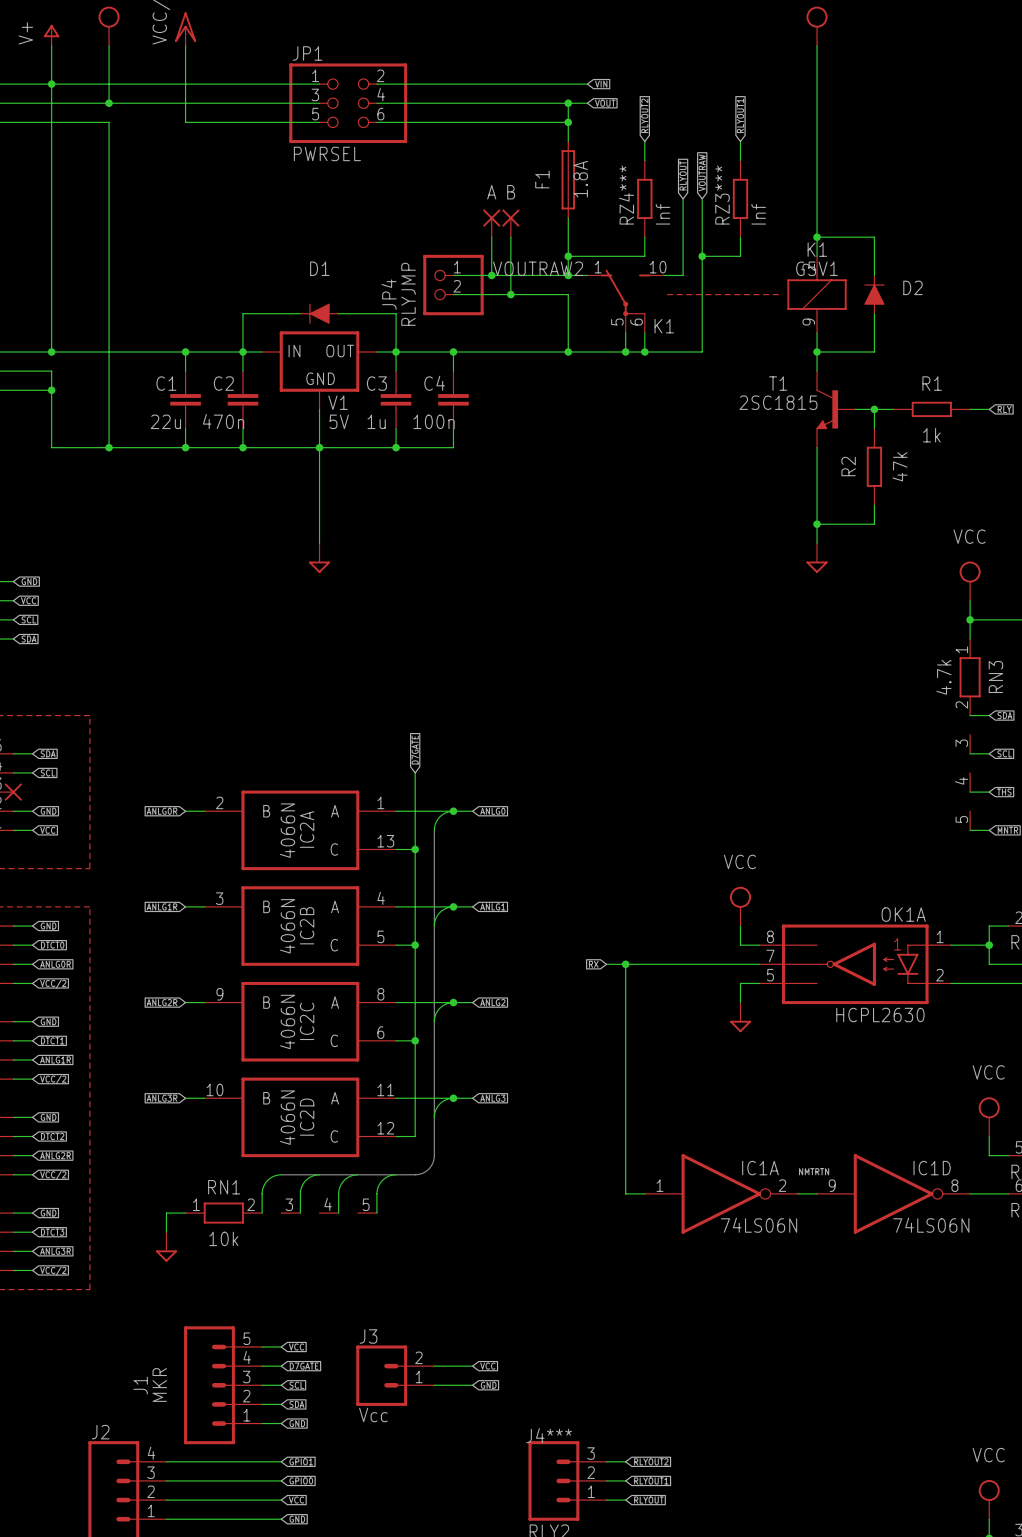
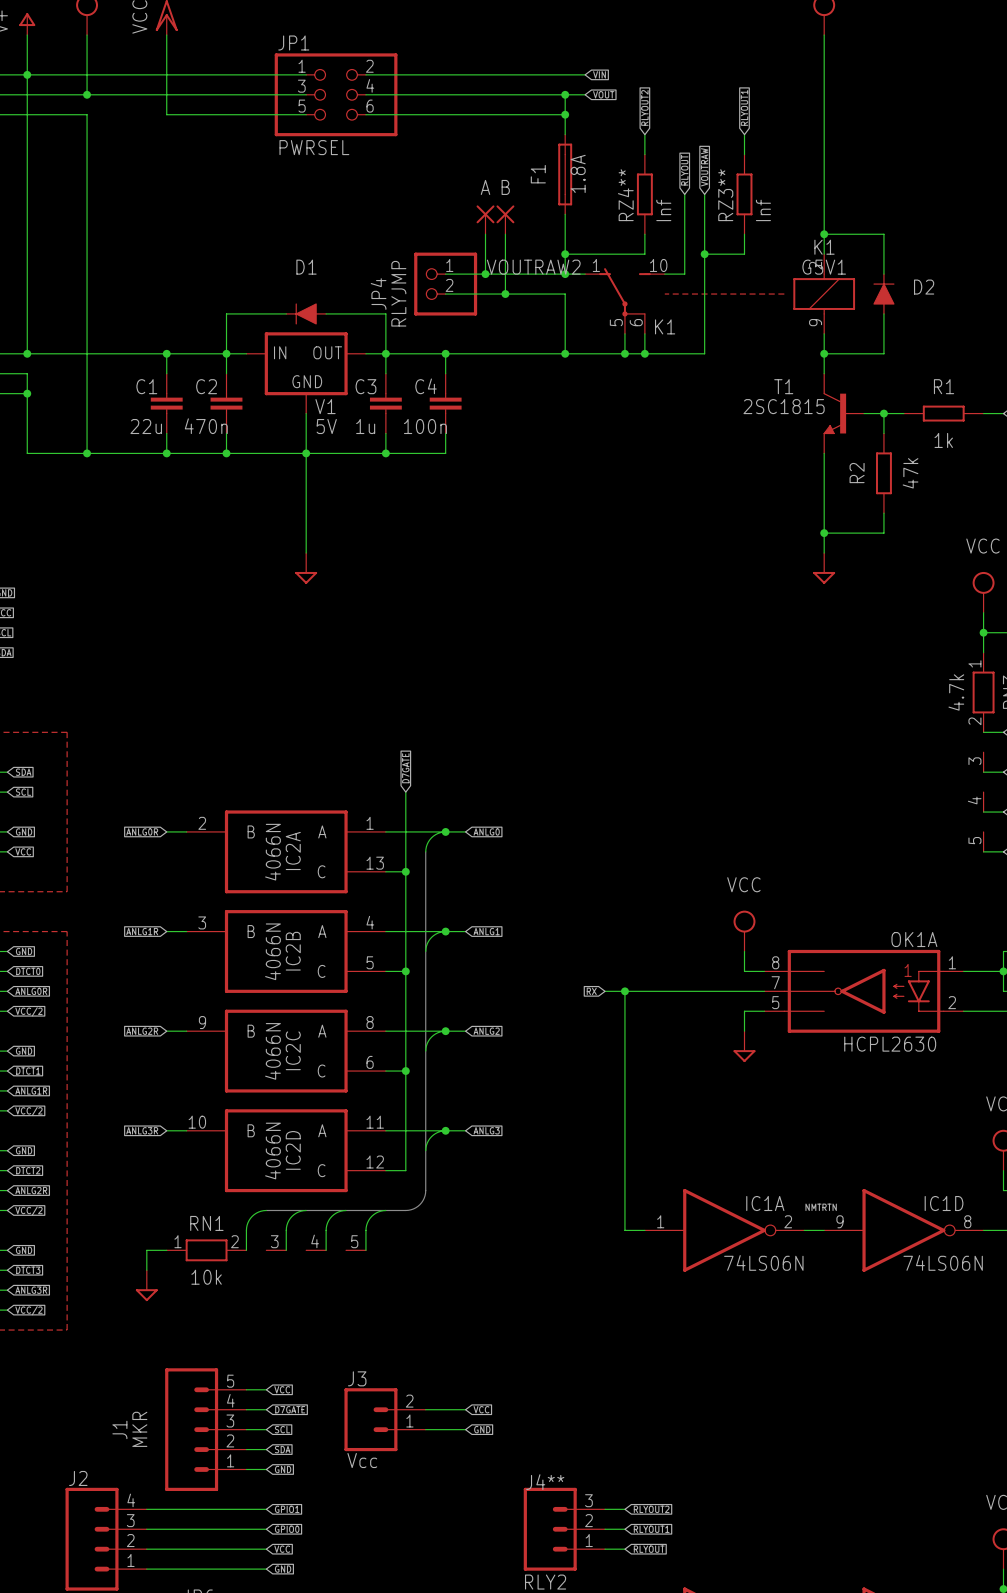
RZ4*** name: RZ4*** (626, 195) -> RZ4** (625, 195)
RZ3*** name: RZ3*** (722, 195) -> RZ3** (725, 195)
J4*** name: J4*** (549, 1435) -> J4** (545, 1482)

